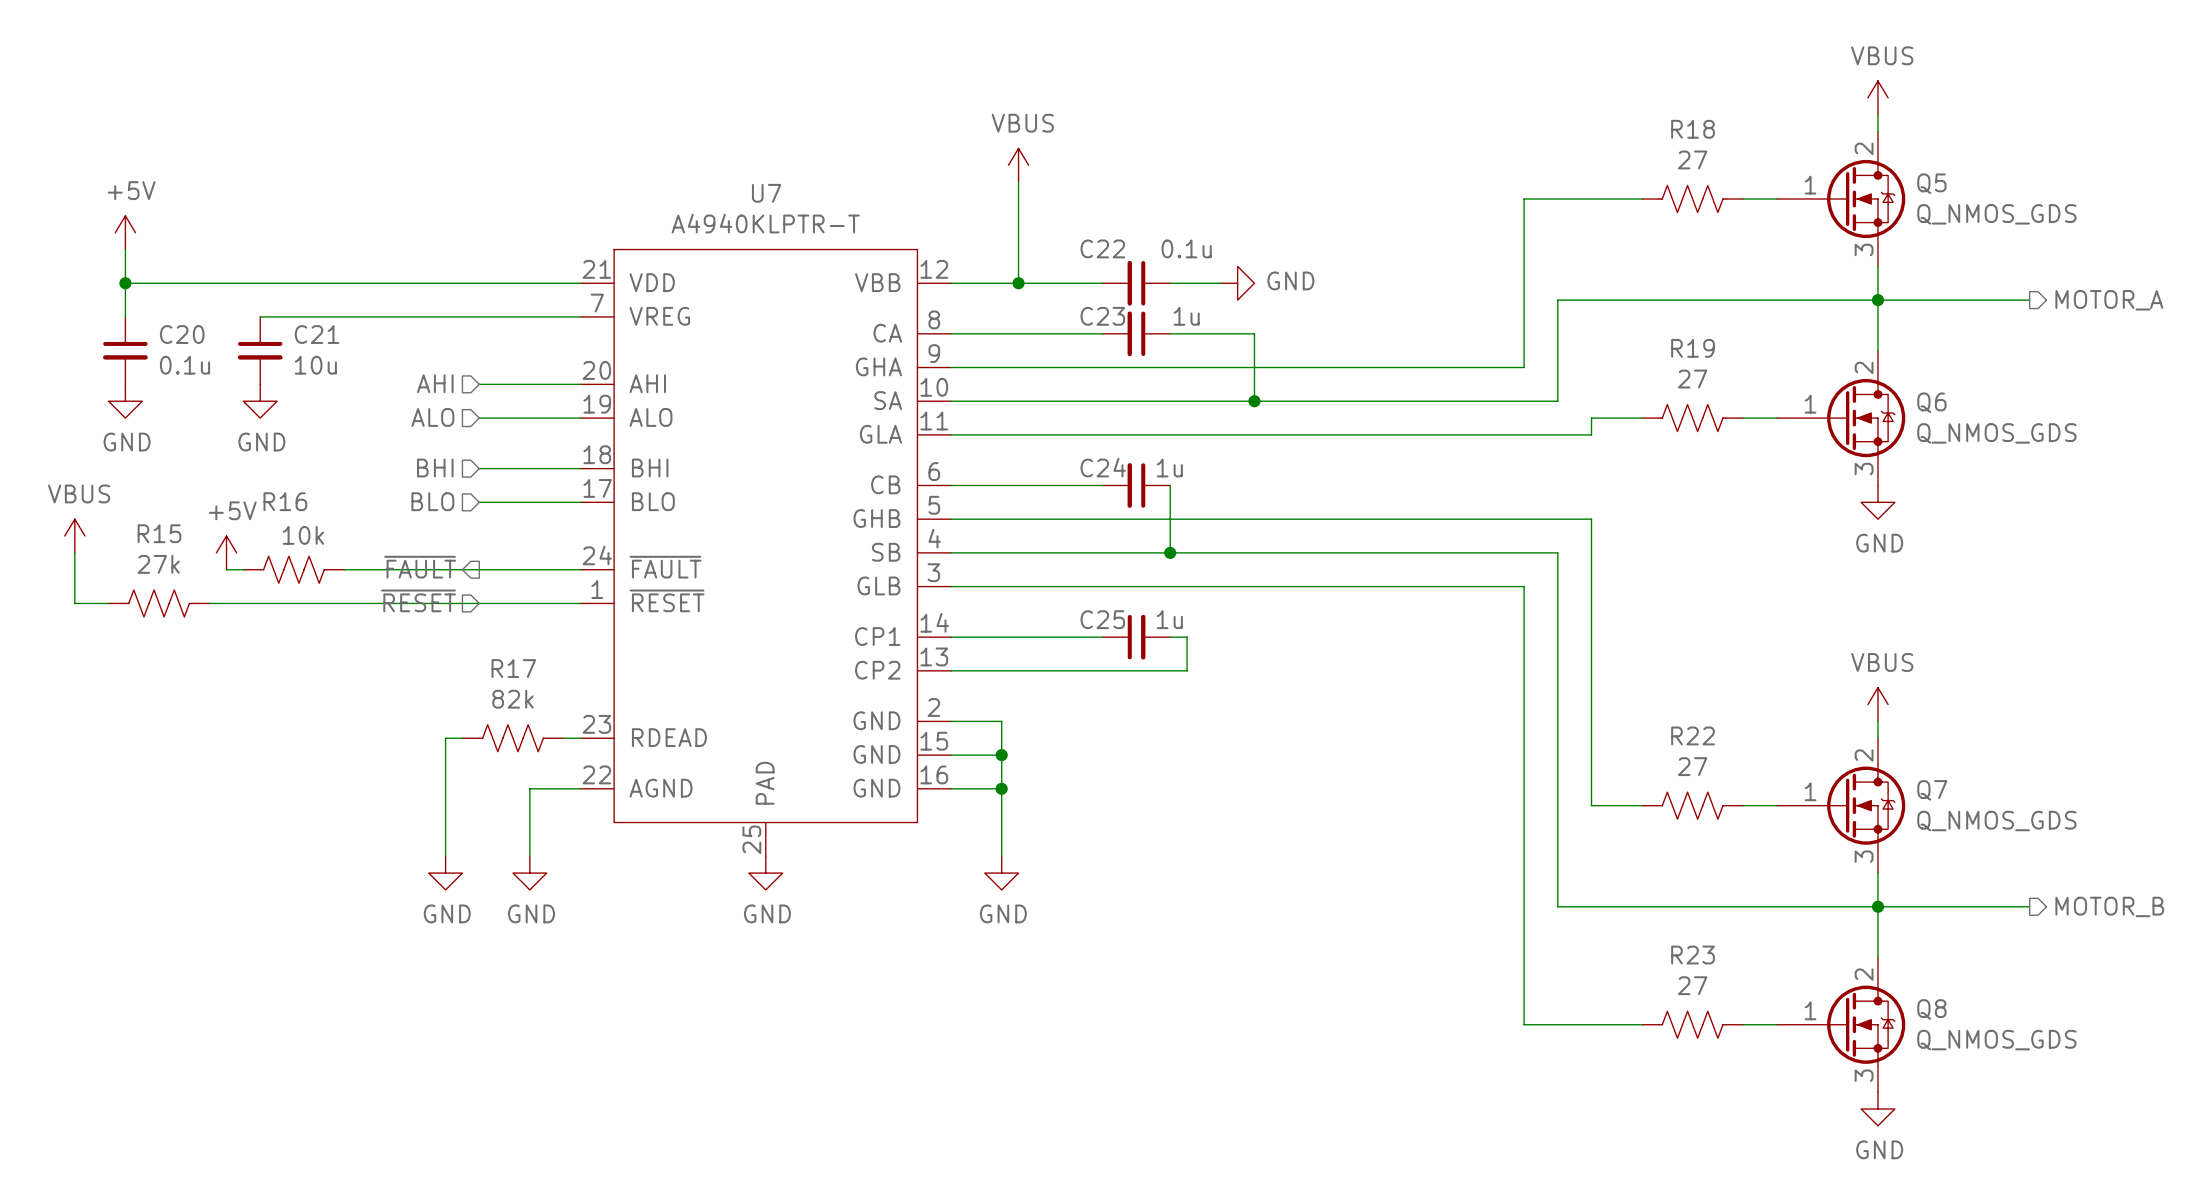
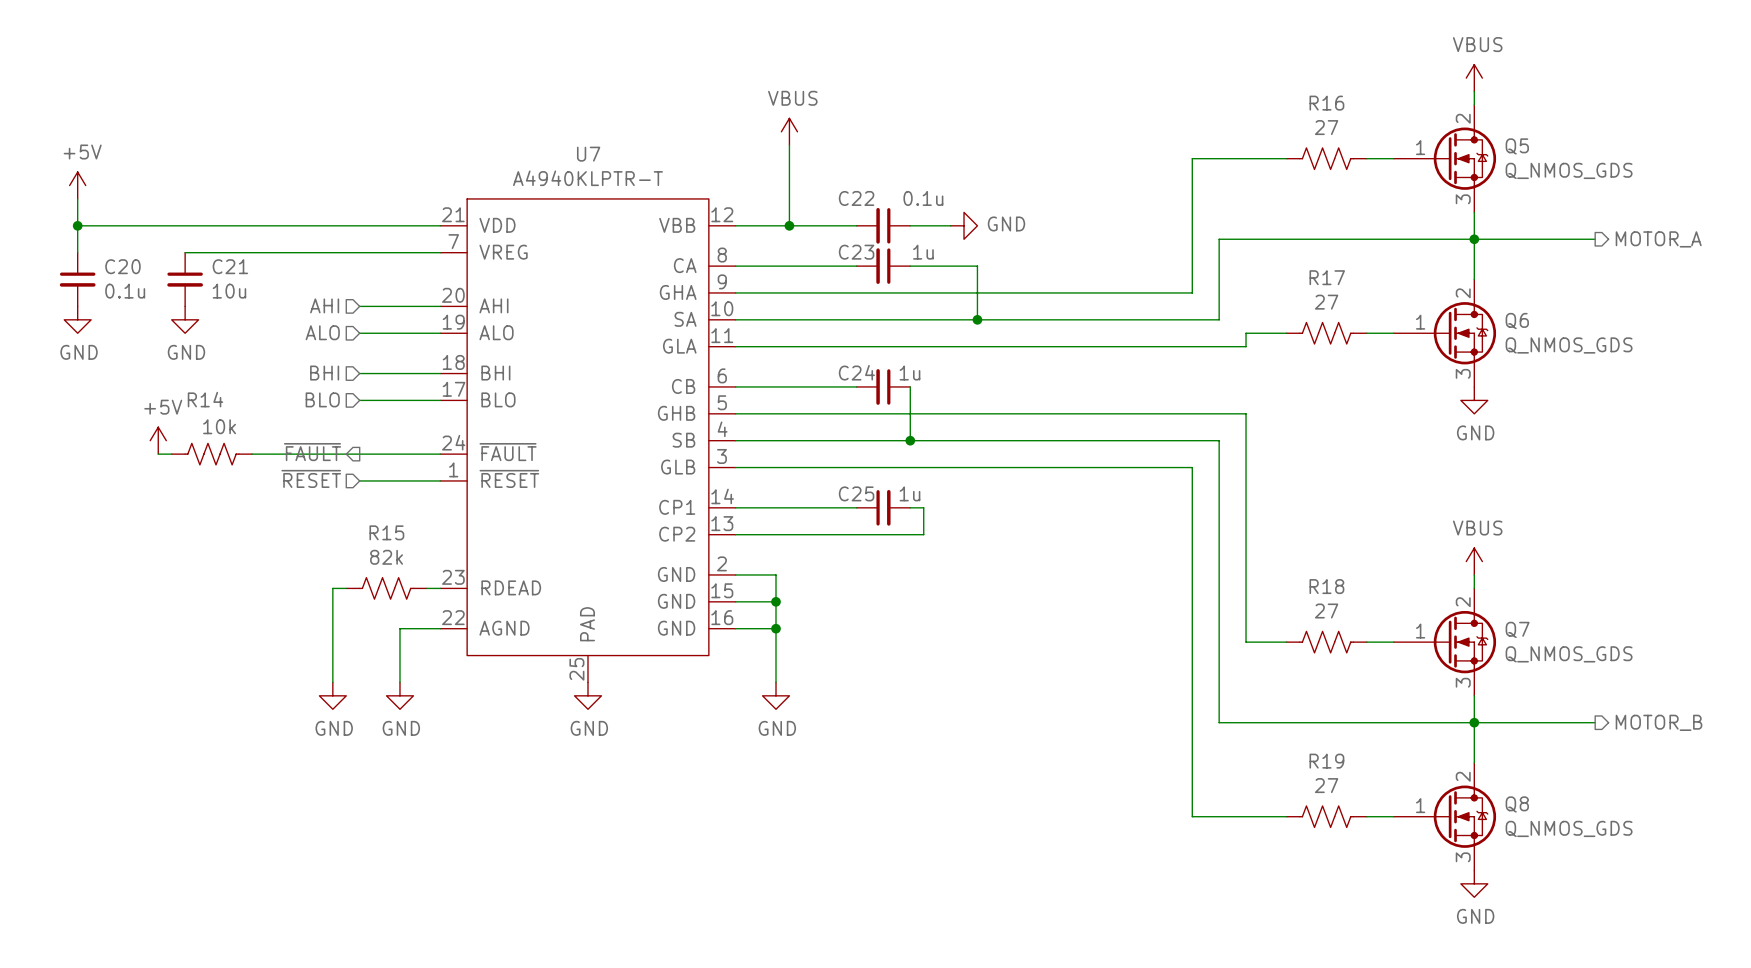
R18 name: R18 (1693, 129) -> R16 (1326, 103)
R19 name: R19 (1693, 348) -> R17 (1327, 277)
R16 name: R16 (285, 501) -> R14 (205, 399)
power symbol: VBUS (74, 536) -> none
wire: (74, 552) (74, 603) (108, 603) -> none
R15: 27k (159, 603) -> none
wire: (209, 603) (479, 603) -> none
R17 name: R17 (513, 668) -> R15 (386, 532)
R22 name: R22 (1693, 735) -> R18 (1326, 586)
R23 name: R23 (1693, 955) -> R19 (1326, 761)

